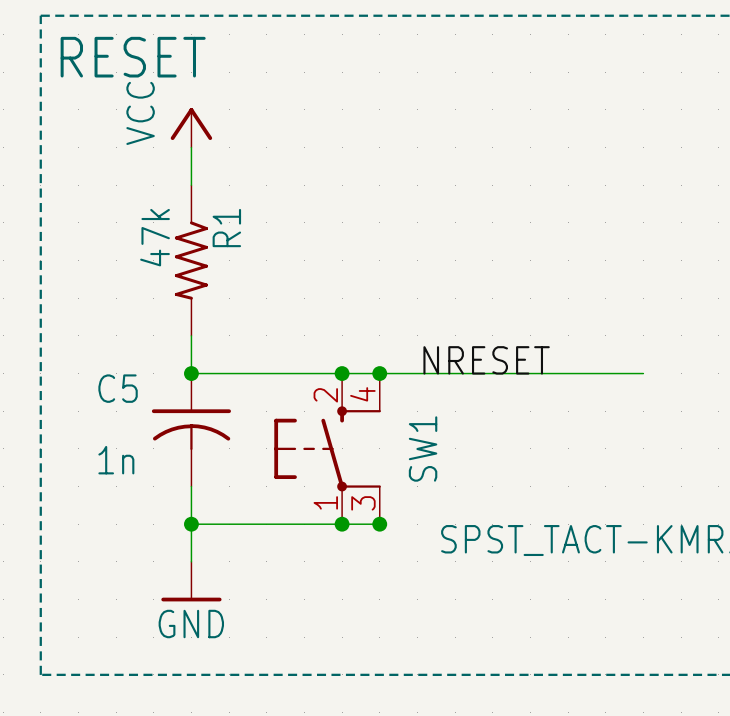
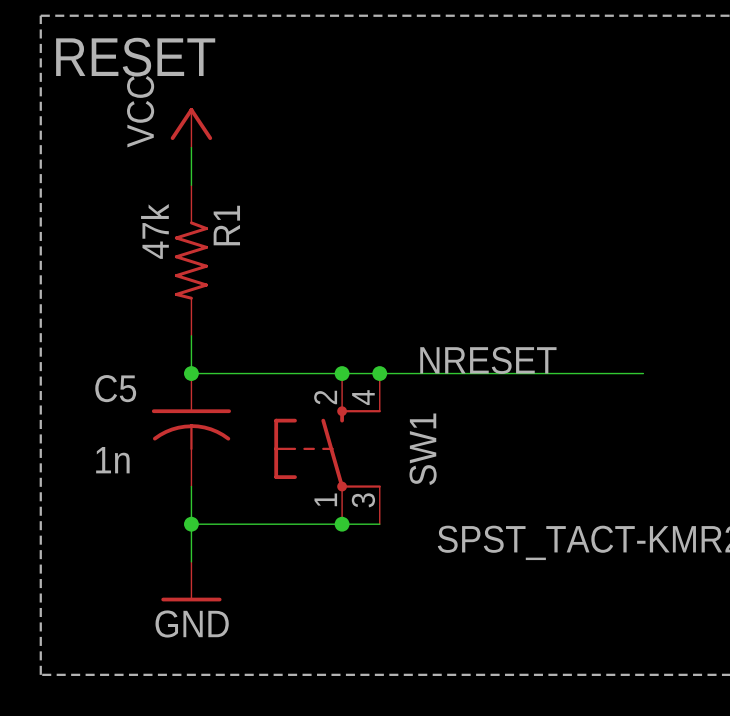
junction: (379, 524) -> none

